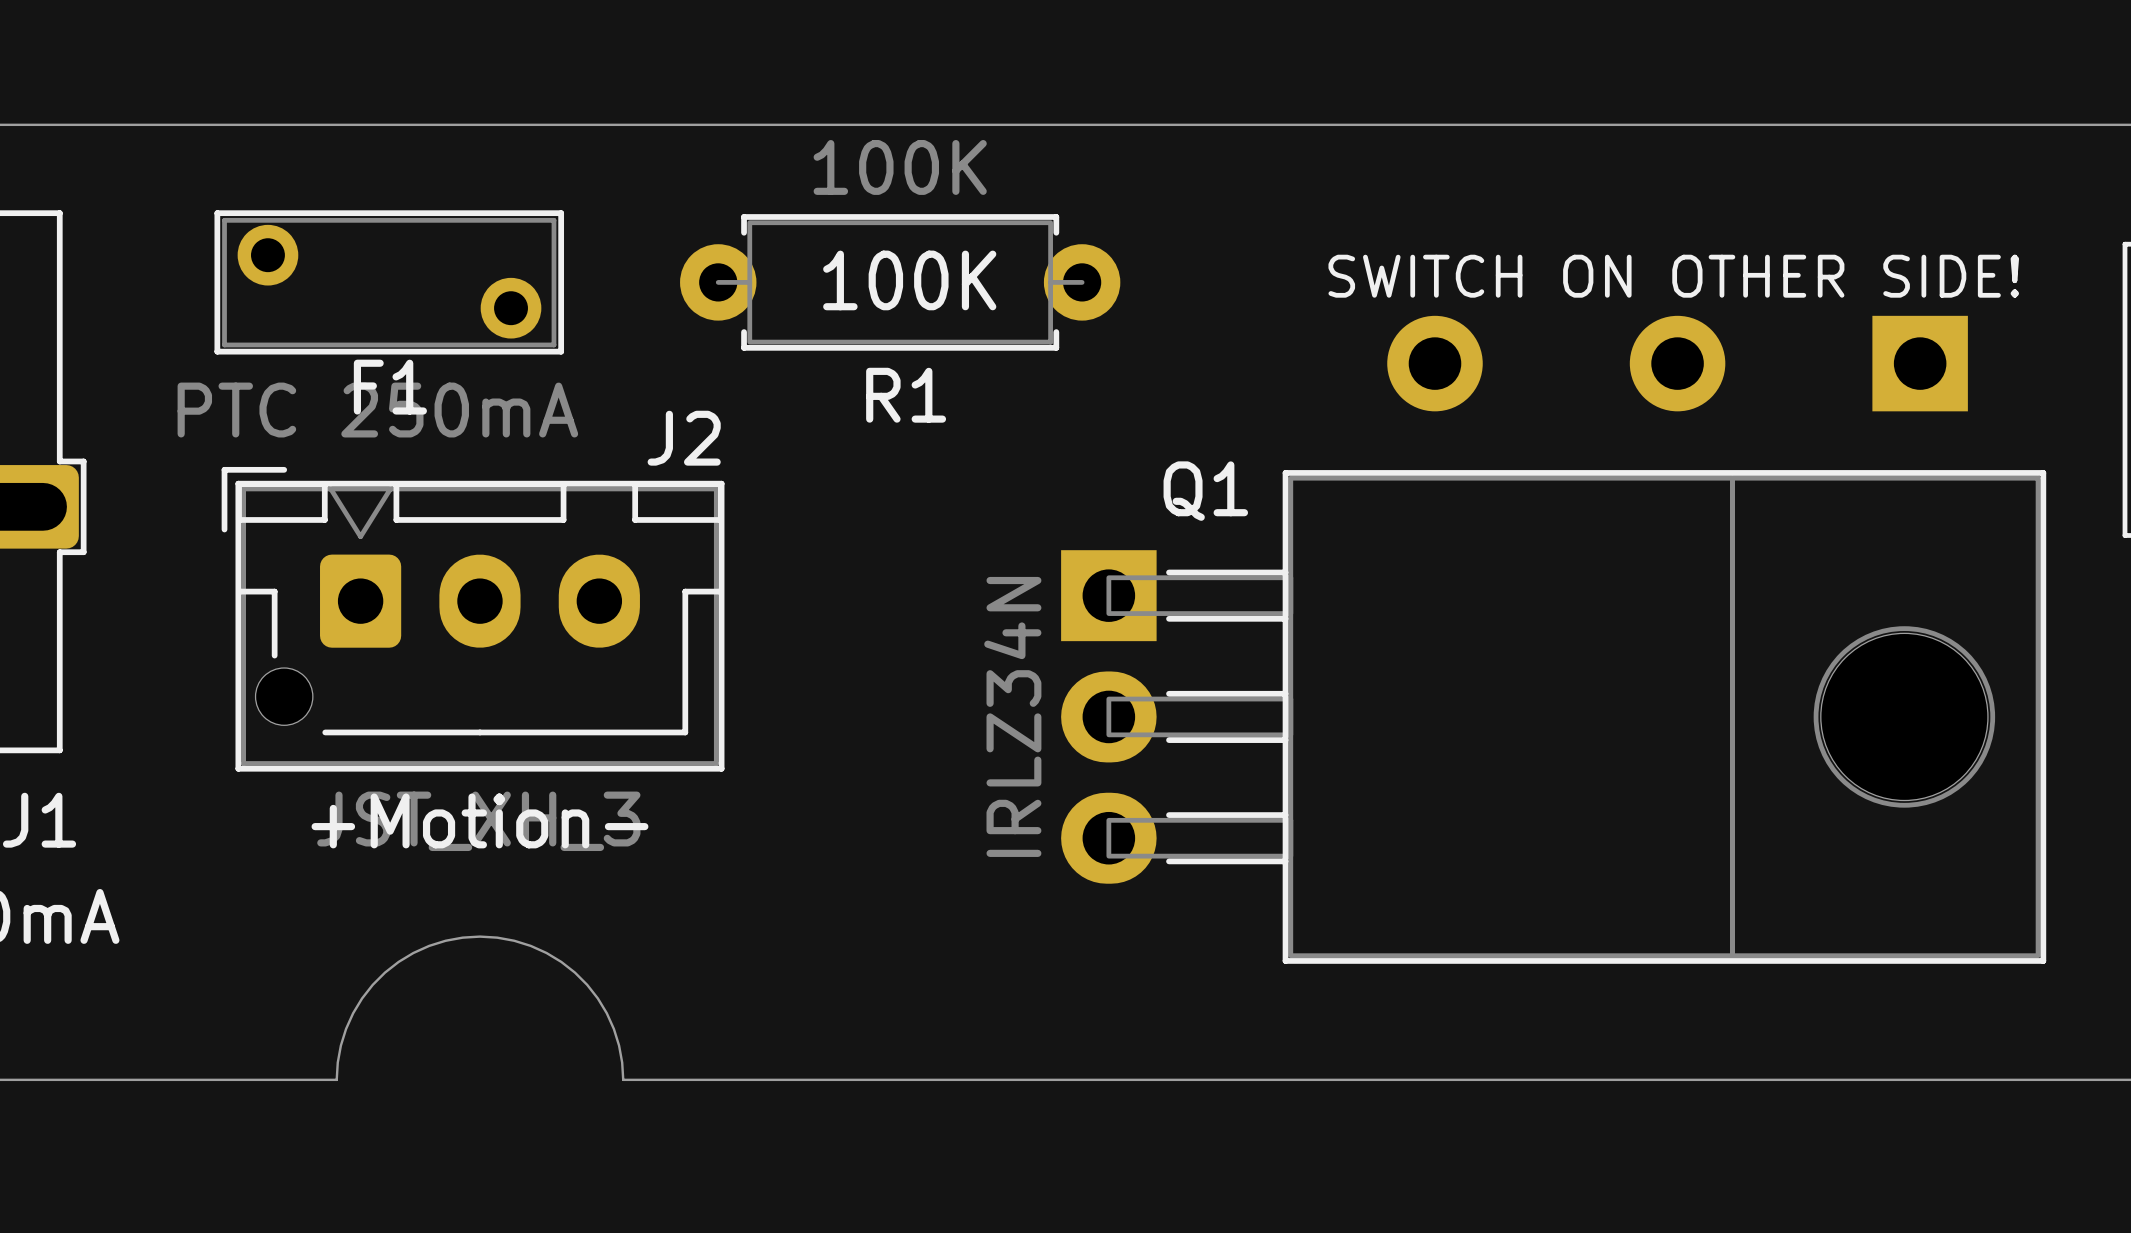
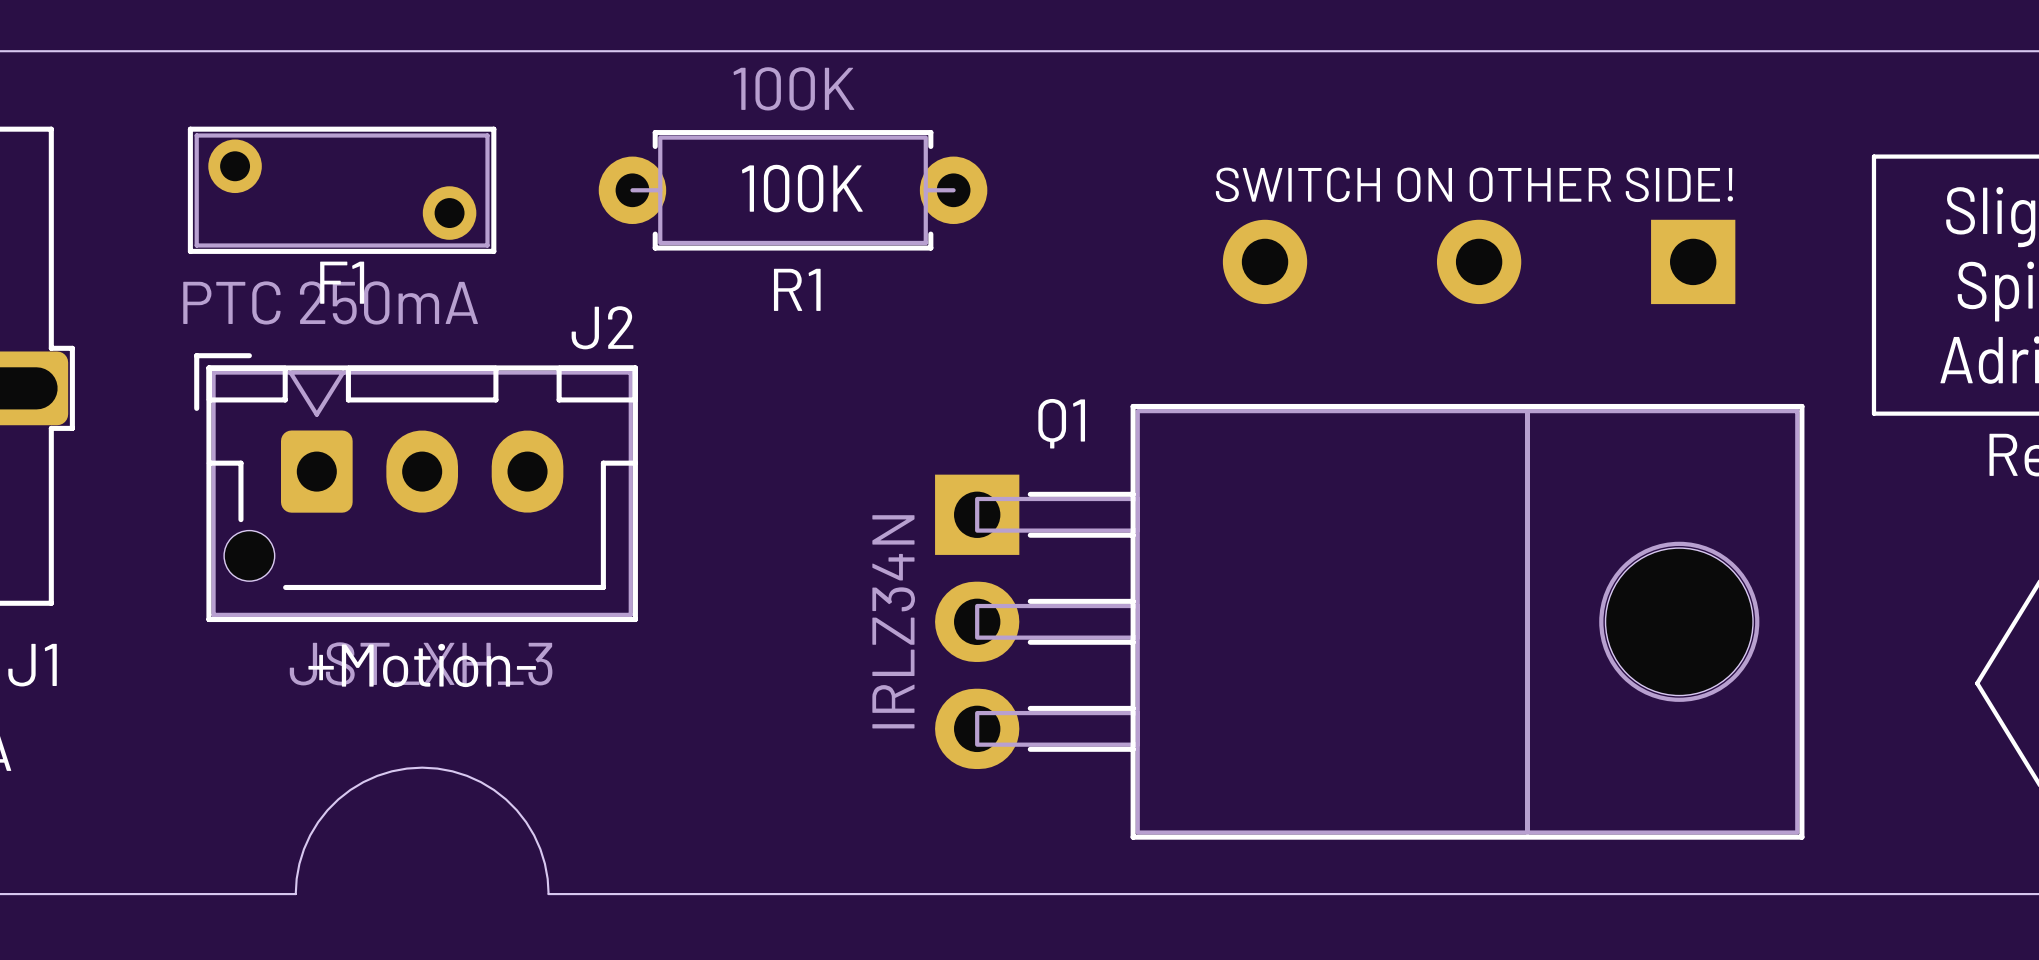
Q1 position: (1553, 716) -> (1369, 621)

